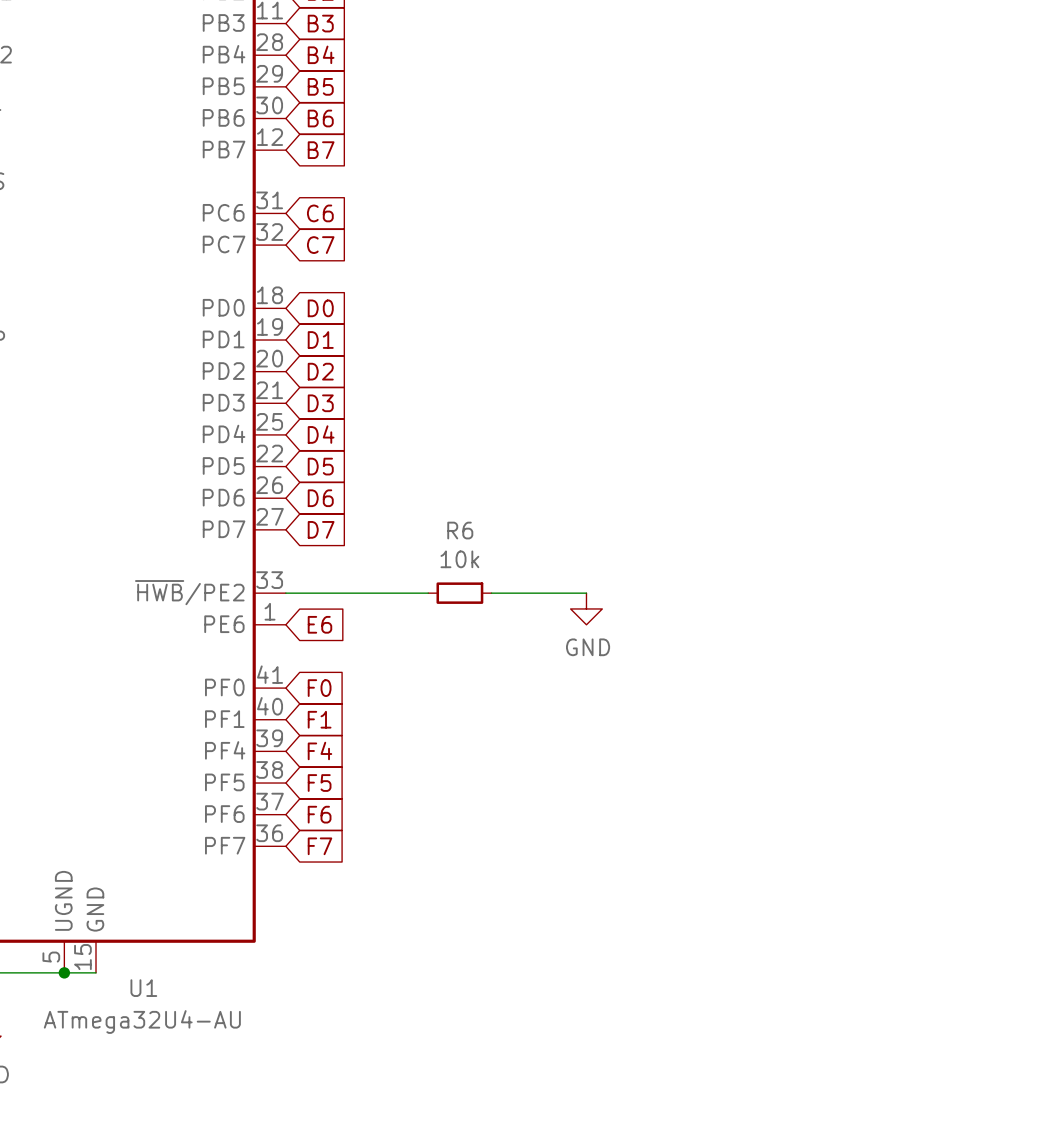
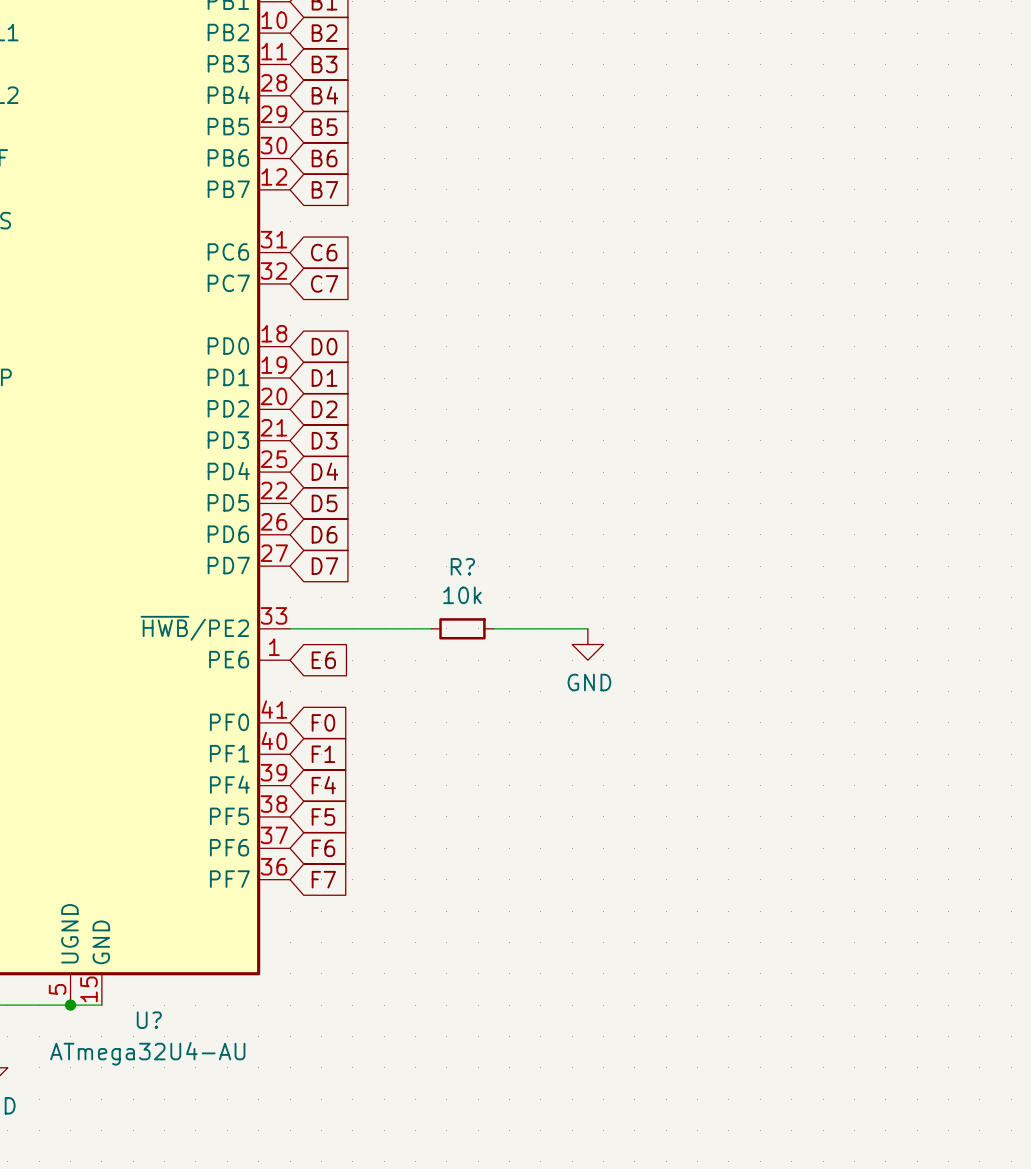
R6 name: R6 (460, 530) -> R? (462, 566)
U1 name: U1 (143, 988) -> U? (149, 1020)

